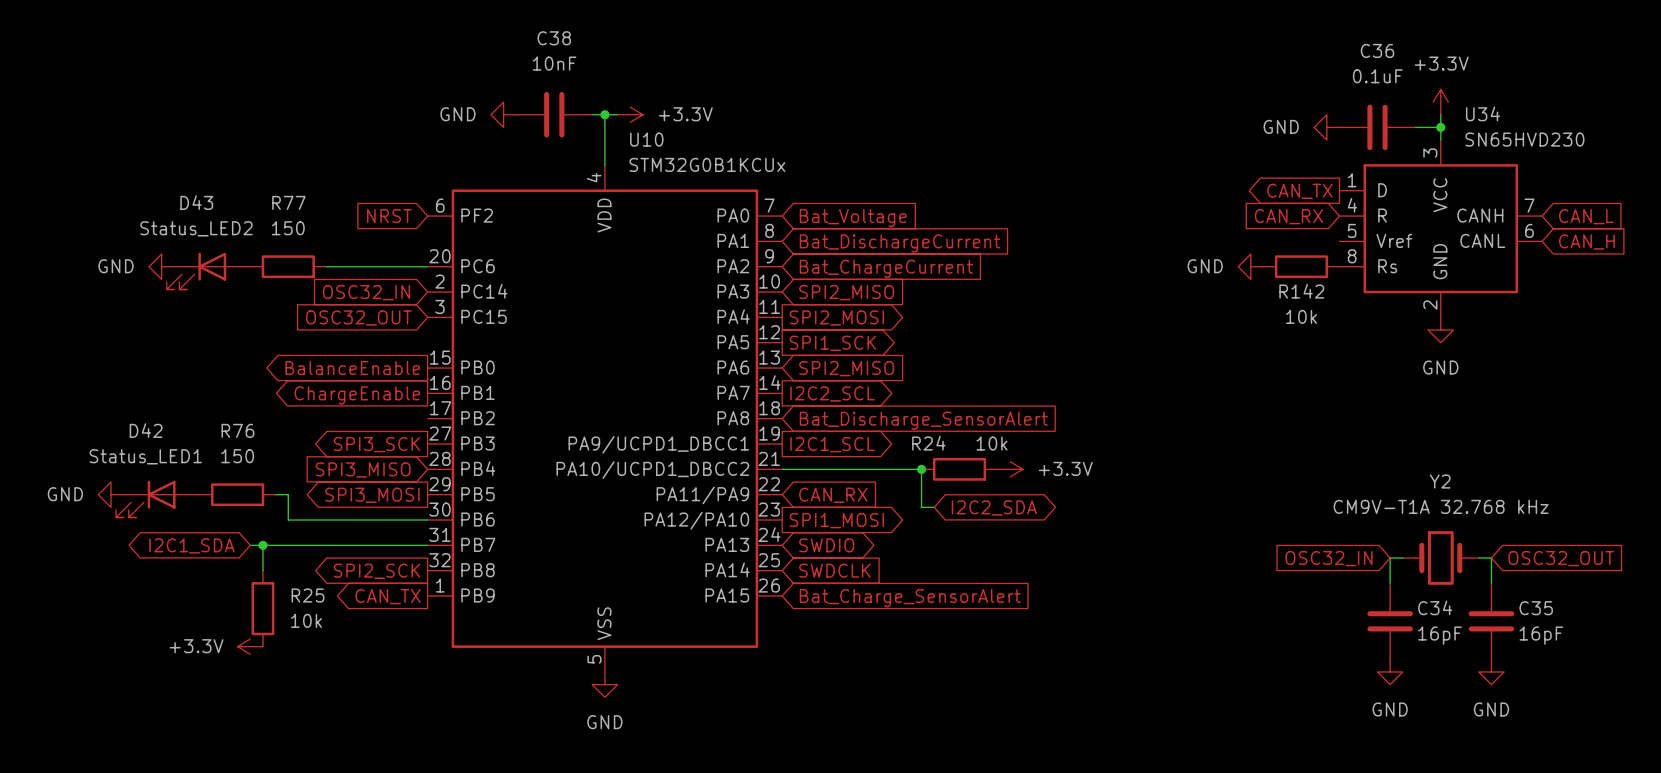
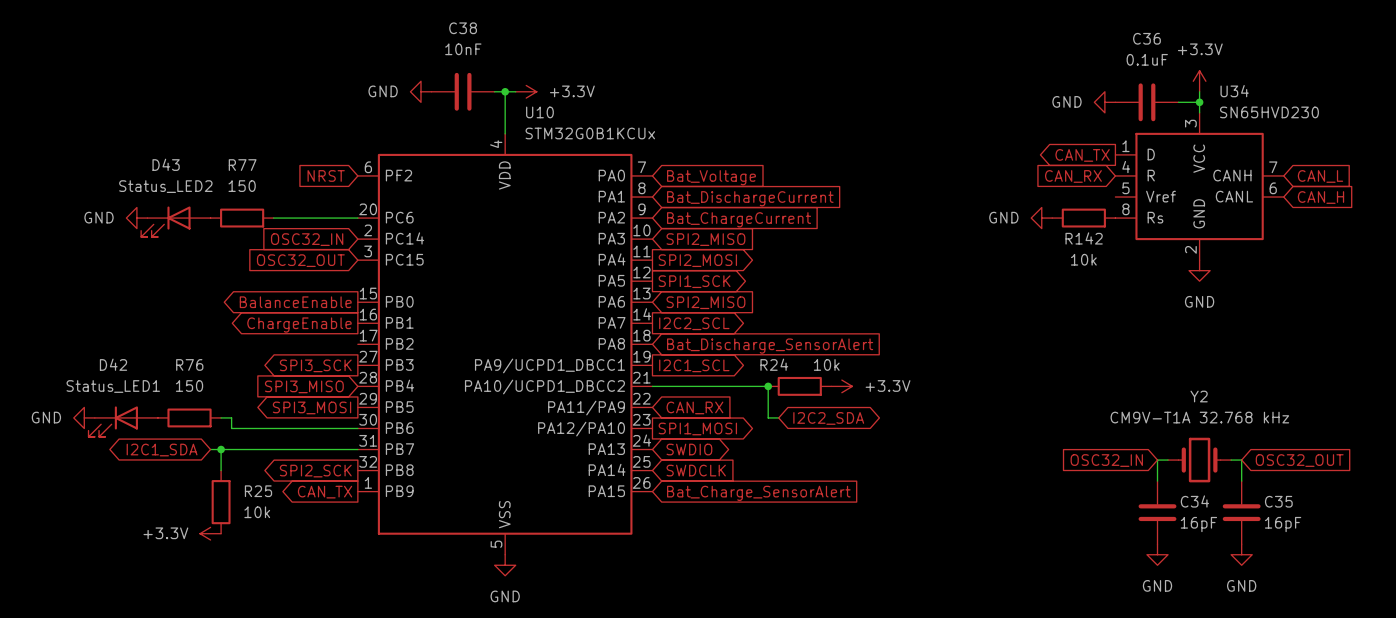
power symbol position: GND (110, 494) -> GND (84, 417)
R76 position: (237, 494) -> (189, 417)
wire: (275, 494) (288, 494) (288, 520) -> (221, 417) (231, 417) (231, 428) (242, 428)
D42 position: (157, 499) -> (123, 421)

